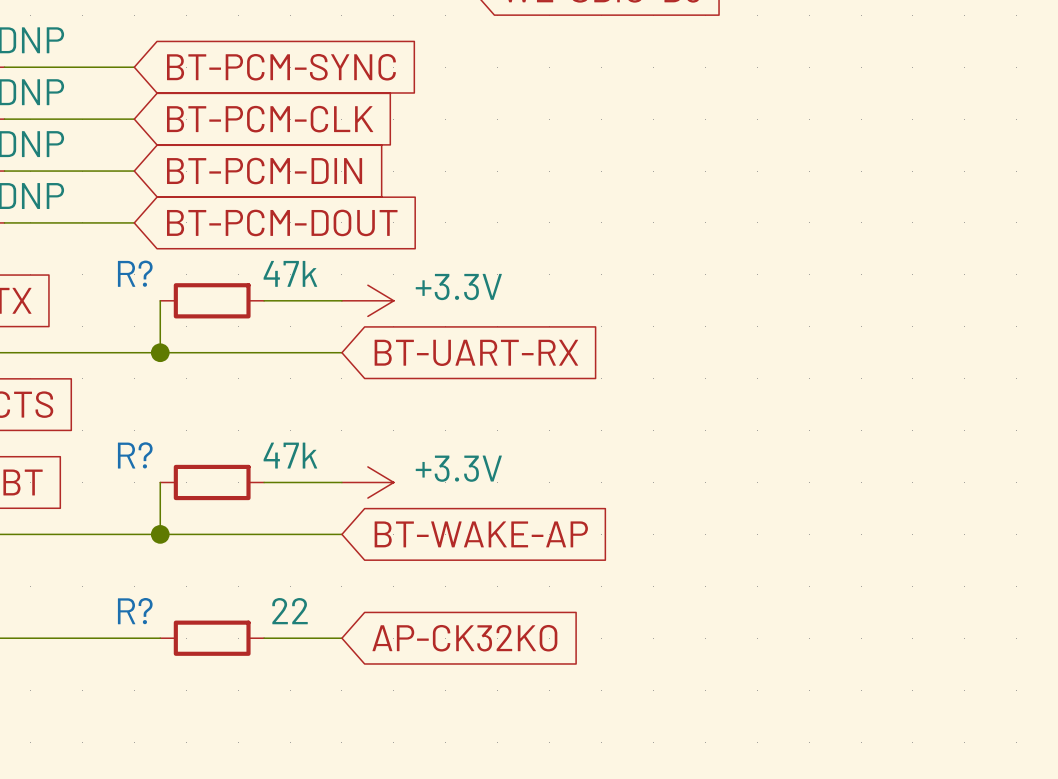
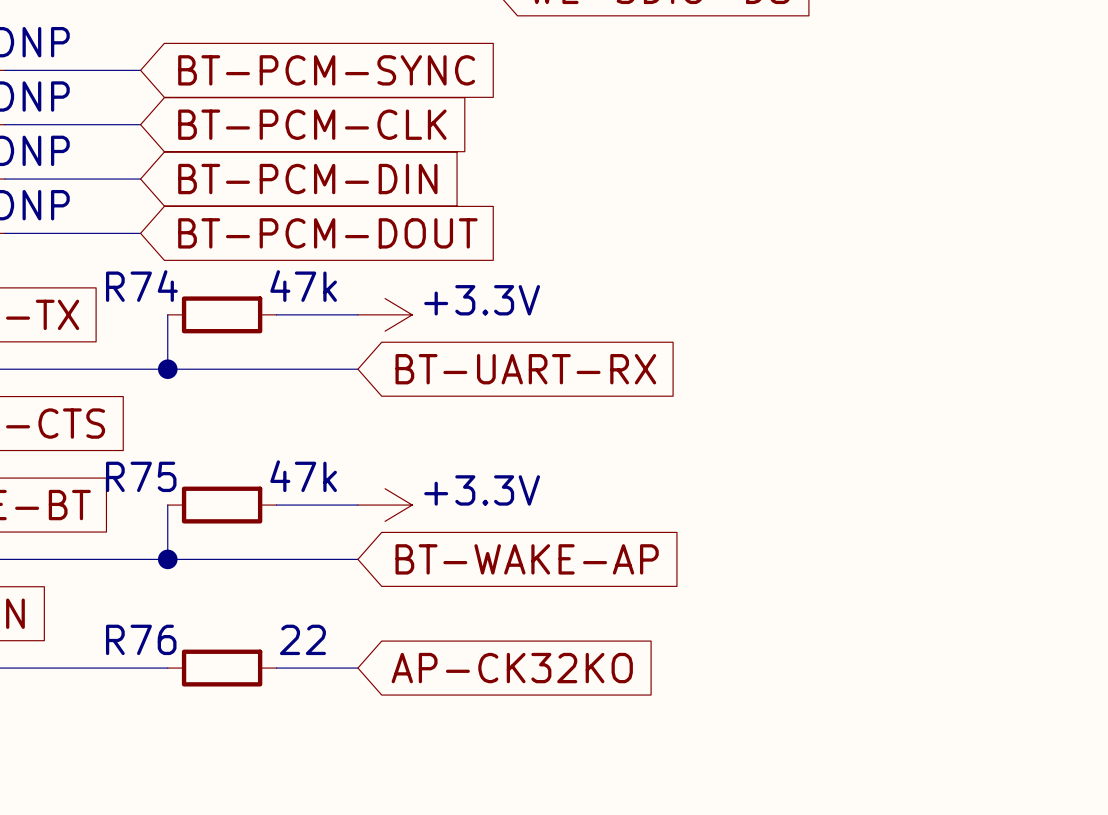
R? name: R? (135, 273) -> R74 (141, 286)
R? name: R? (135, 455) -> R75 (141, 476)
R? name: R? (135, 611) -> R76 (141, 639)

